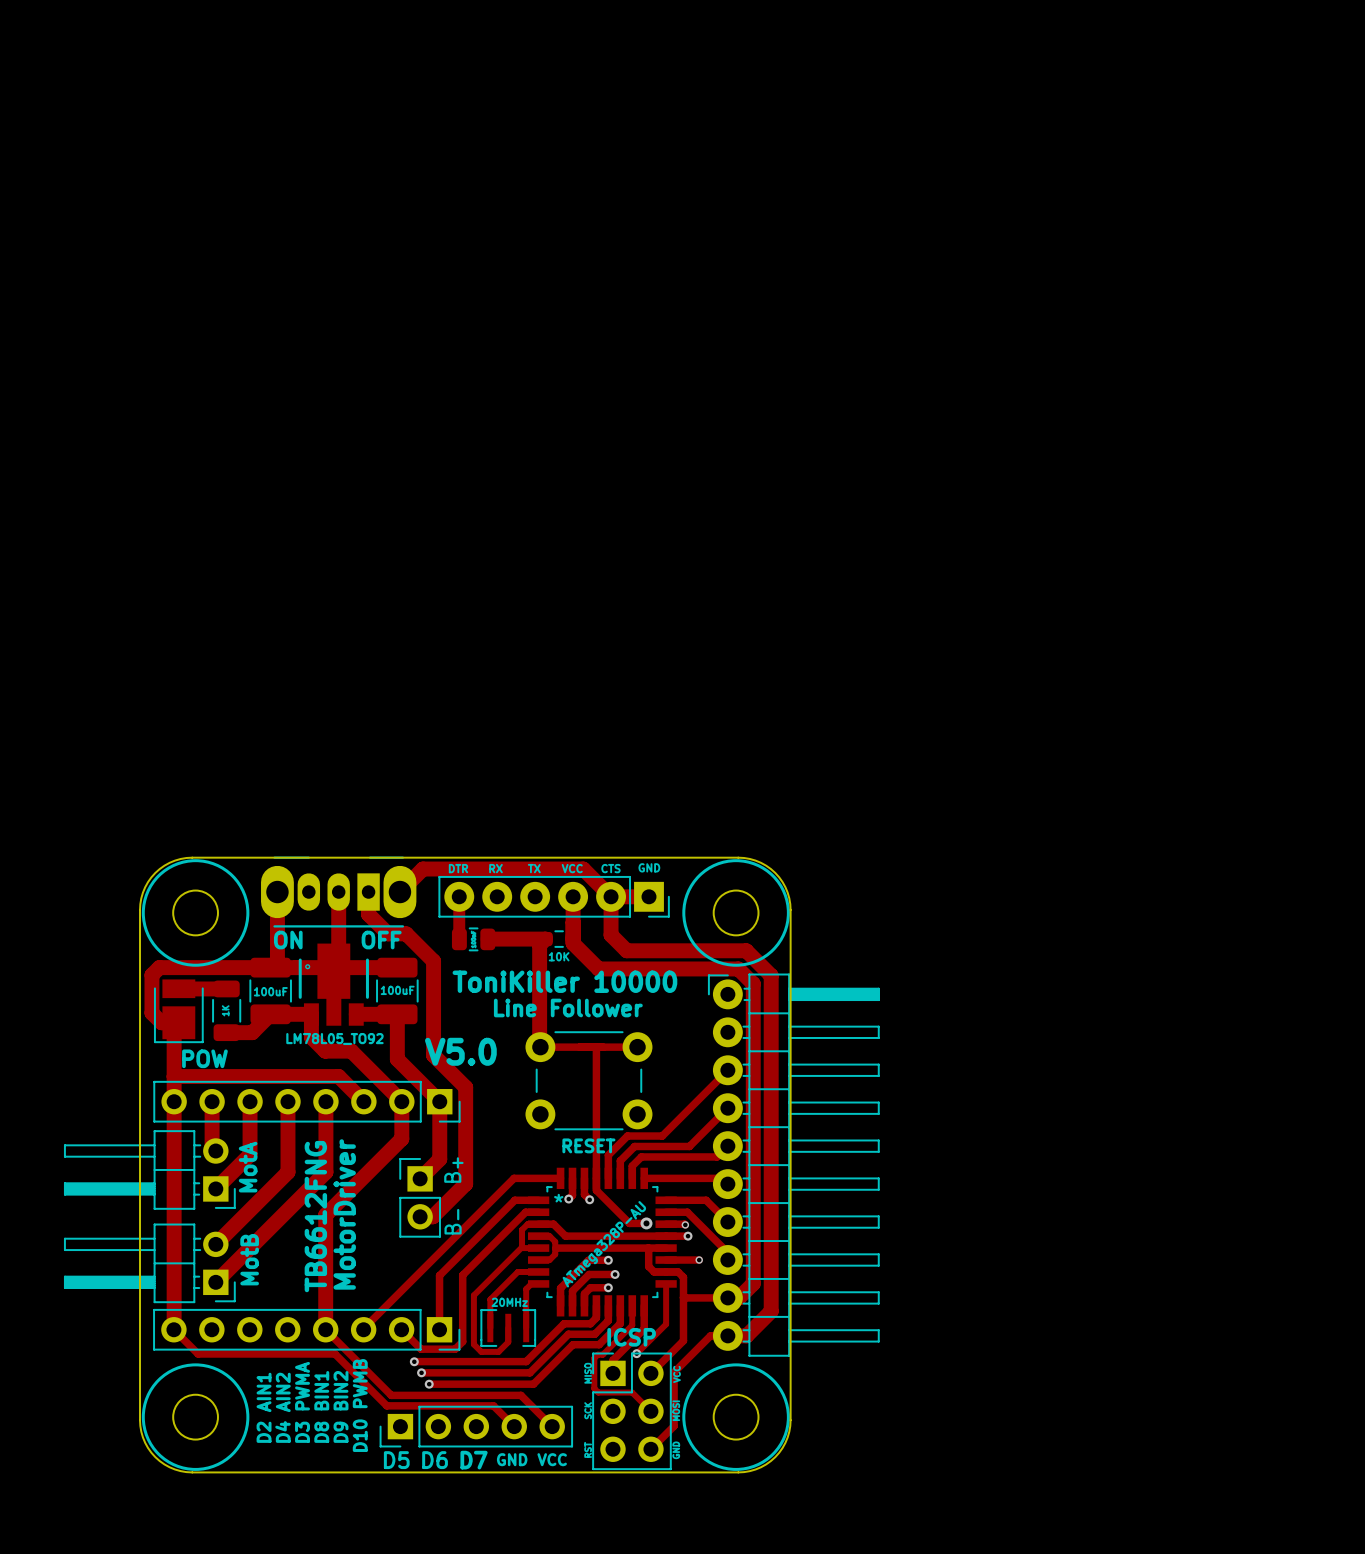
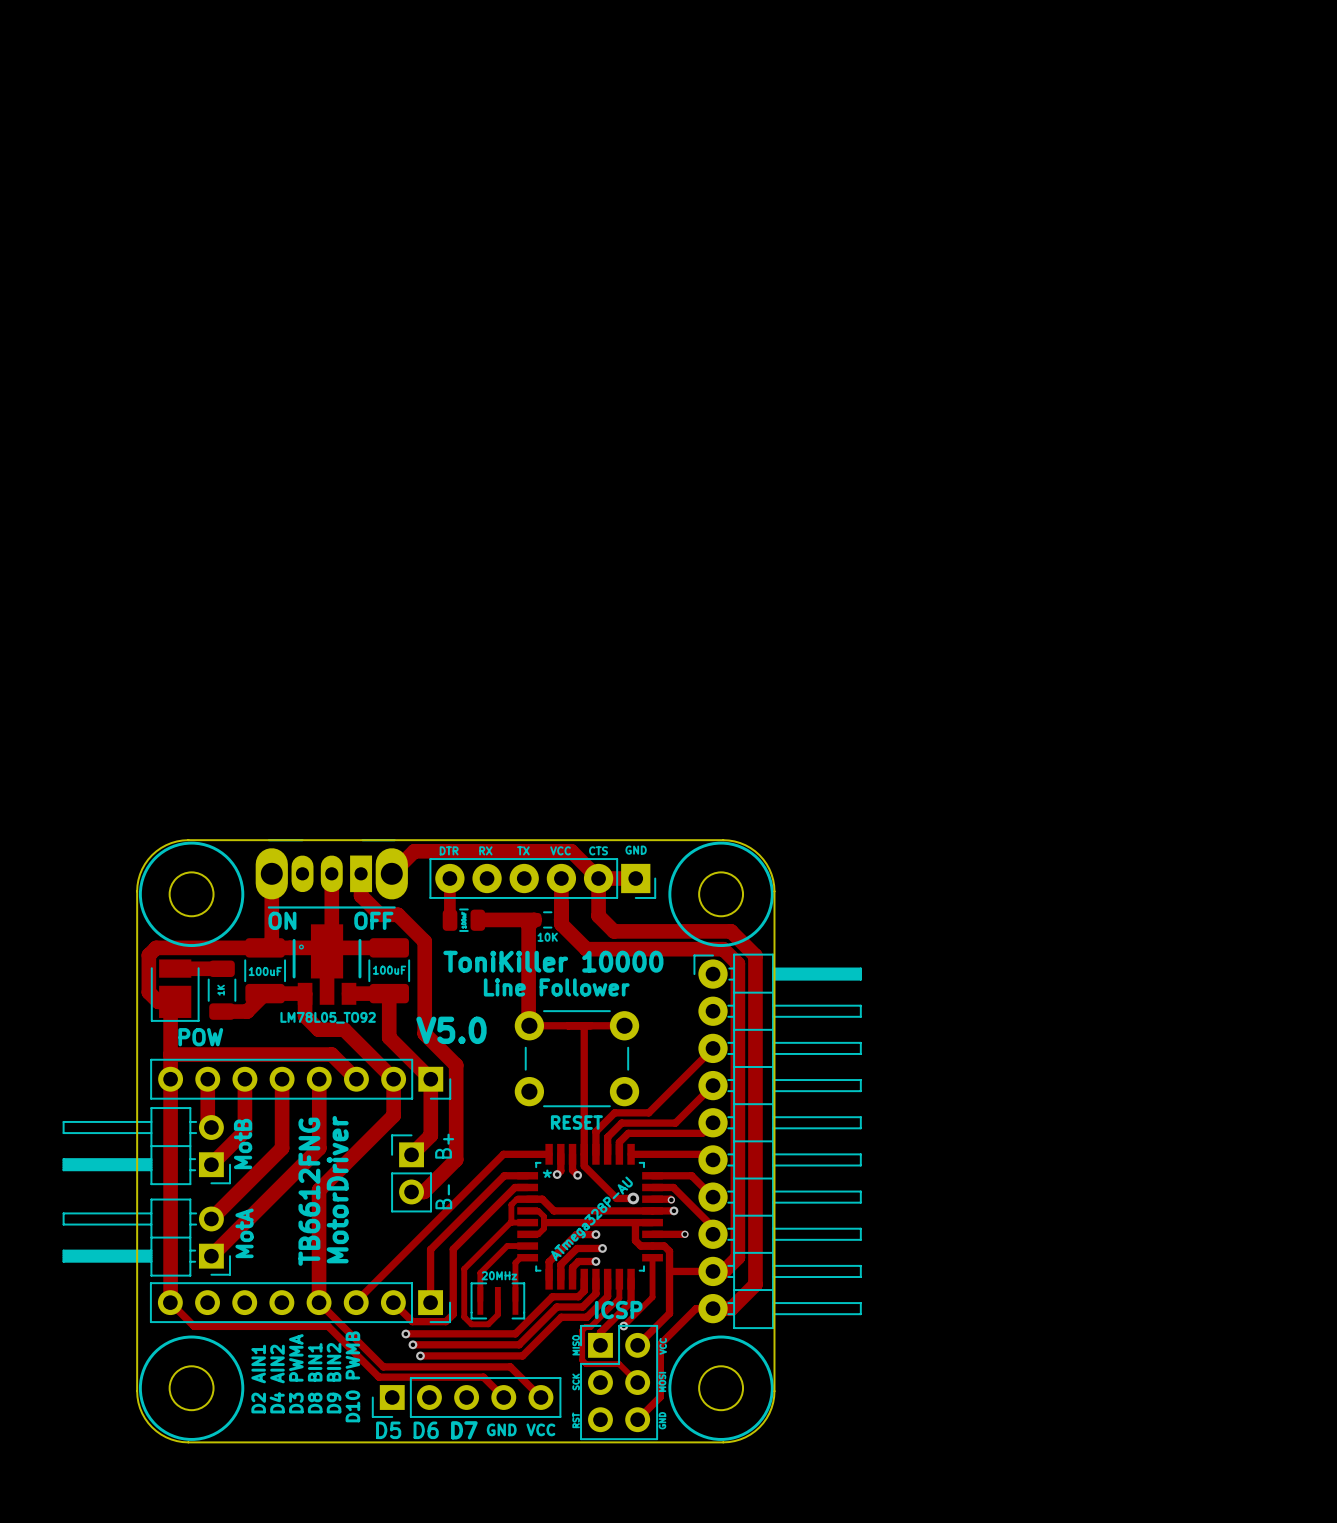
part value: MotA (248, 1167) -> MotB (243, 1144)
part value: MotB (249, 1259) -> MotA (244, 1233)

